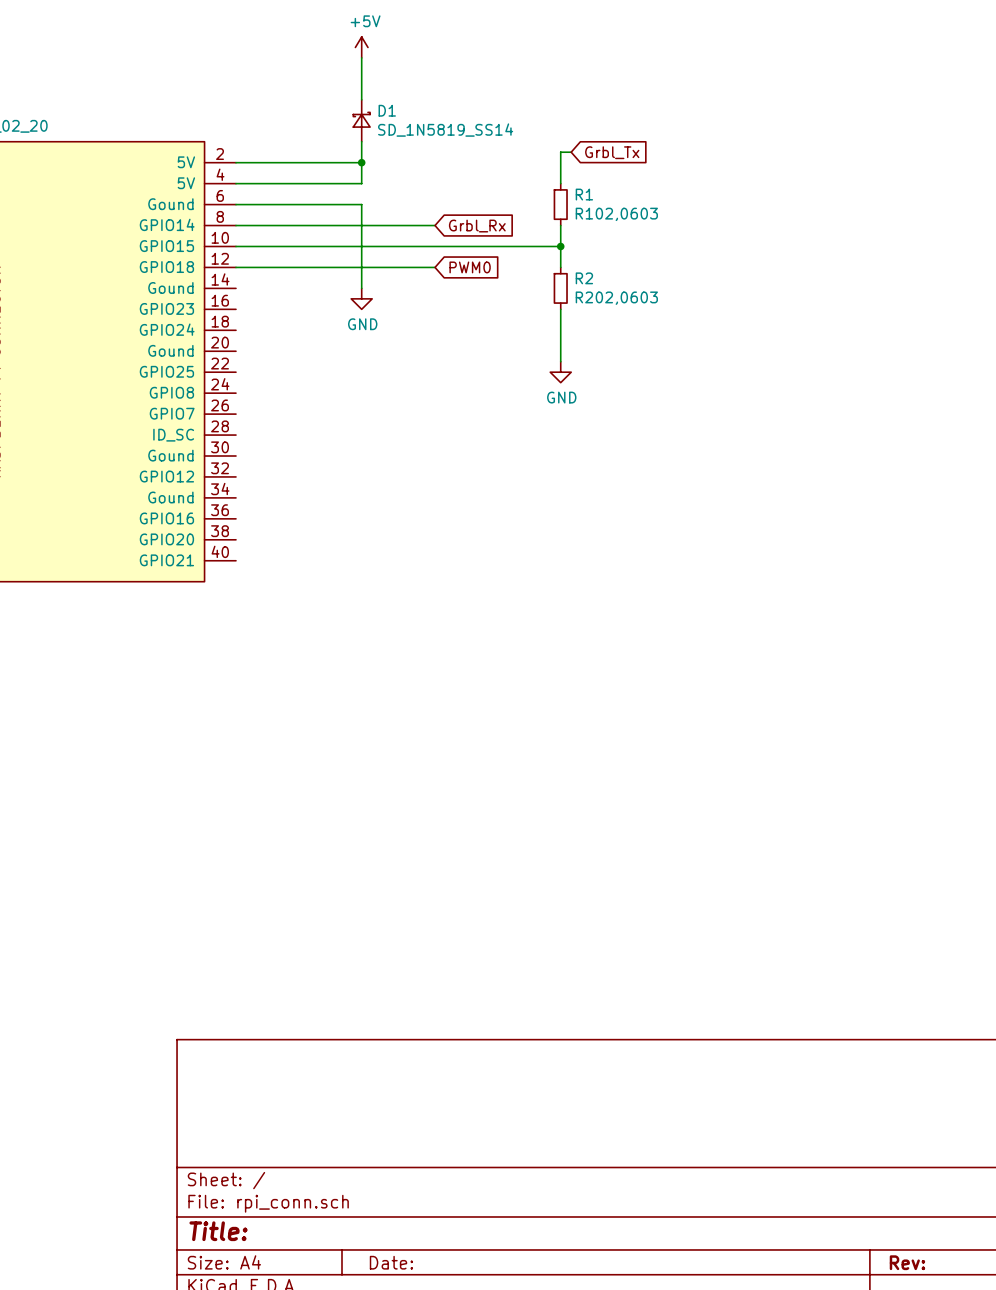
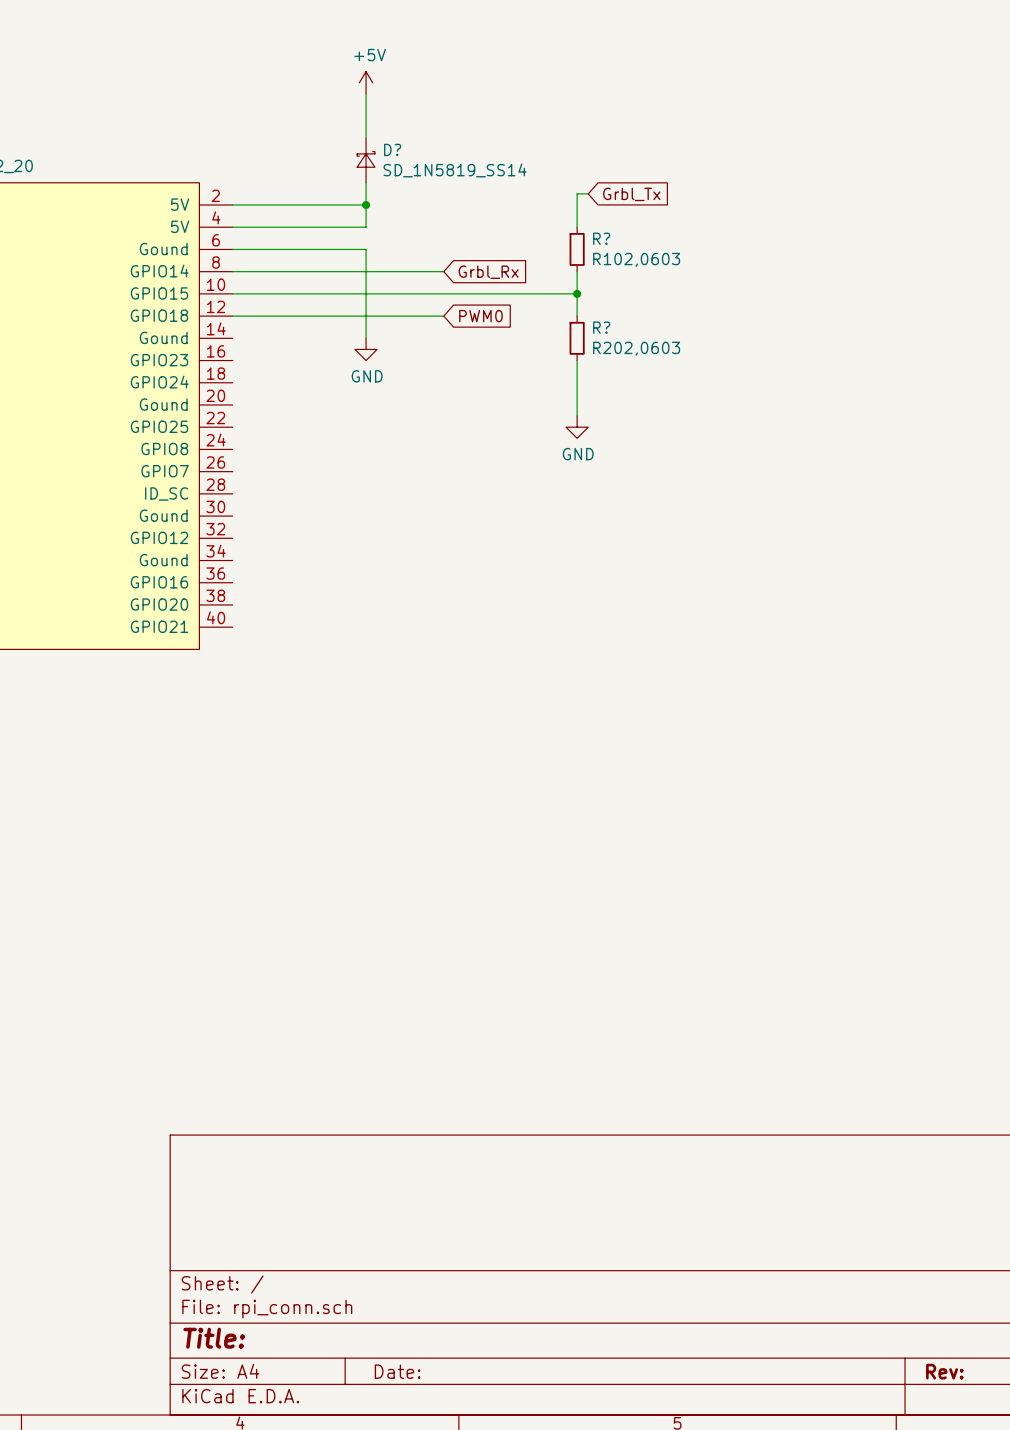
D1 name: D1 (387, 110) -> D? (392, 149)
R1 name: R1 (584, 194) -> R? (601, 238)
R2 name: R2 (584, 278) -> R? (601, 327)

